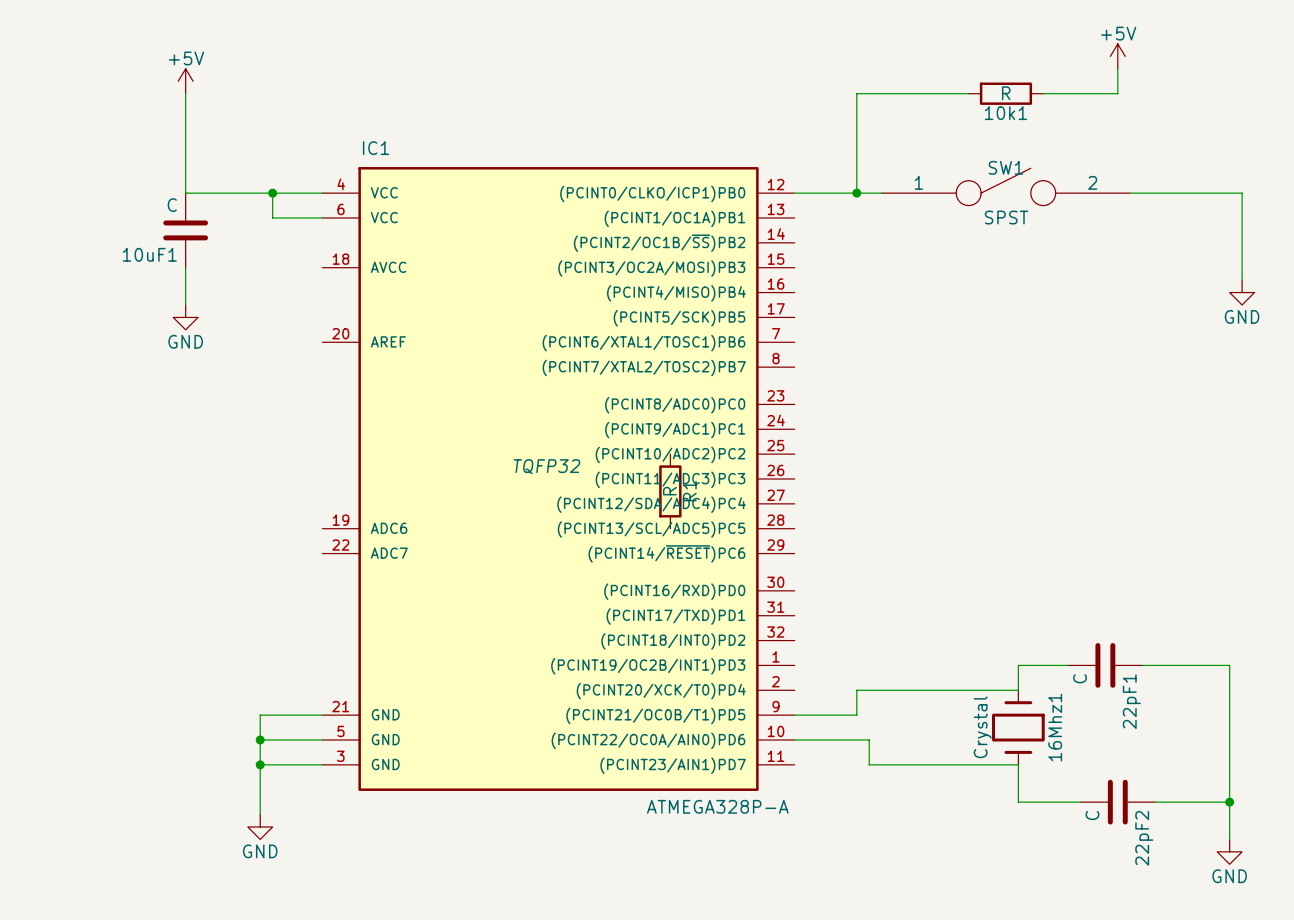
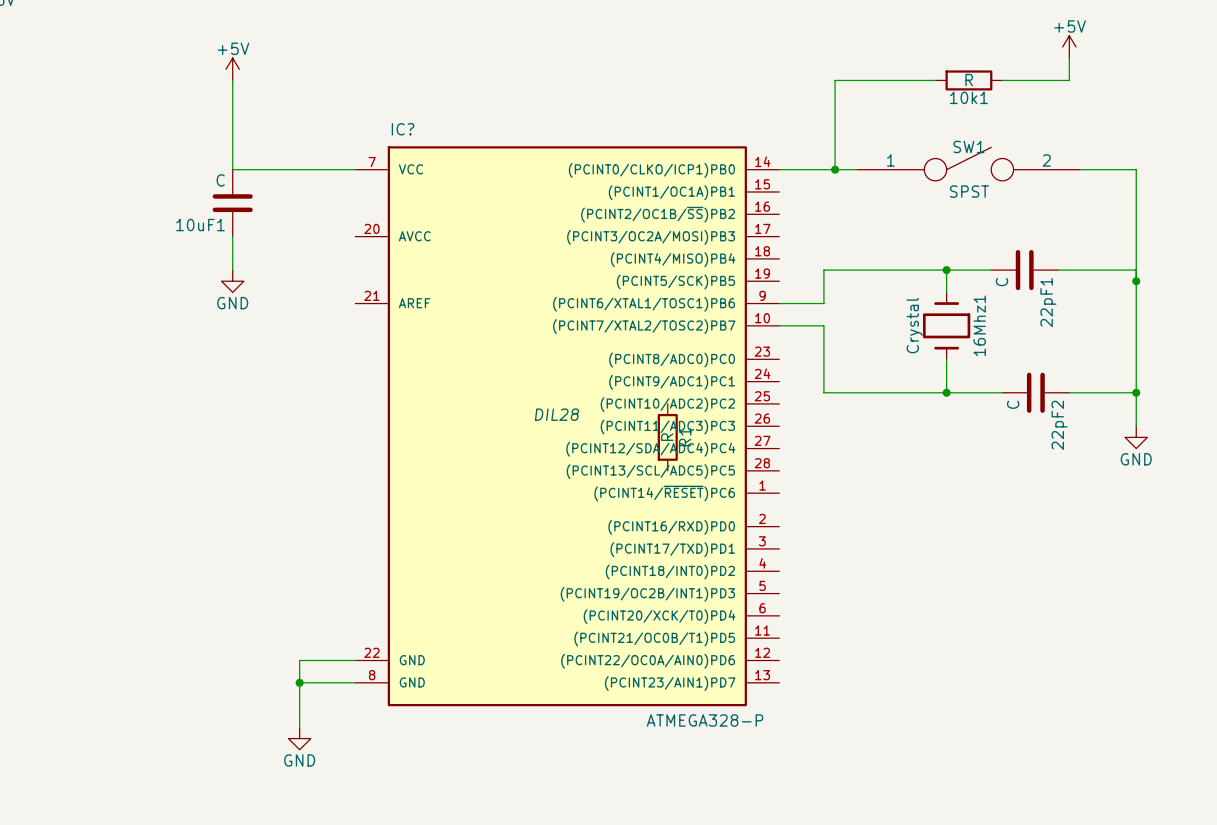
wire: (272, 193) (272, 217) (322, 217) -> none
junction: (272, 193) -> none
wire: (1192, 193) (1242, 193) (1242, 280) -> (1136, 169) (1136, 426)
power symbol: GND (1242, 292) -> none
wire: none -> (946, 270) (946, 292)
junction: none -> (946, 270)
wire: none -> (991, 270) (823, 270) (823, 303) (779, 303)
wire: none -> (1058, 270) (1136, 270)
junction: none -> (1136, 281)
wire: none -> (779, 325) (823, 325) (823, 392) (1002, 392)
wire: none -> (946, 359) (946, 392)
junction: none -> (946, 392)
wire: none -> (1069, 392) (1136, 392)
junction: none -> (1136, 392)
IC1: ATMEGA328P-A (558, 478) -> none
IC?: none -> ATMEGA328-P (567, 426)
power symbol: none -> GND (1136, 437)
wire: (1068, 665) (1018, 665) (1018, 690) (856, 690) (856, 715) (794, 715) -> none
22pF1 position: (1105, 665) -> (1024, 270)
wire: (1142, 665) (1229, 665) (1229, 839) -> none
wire: (322, 715) (260, 715) (260, 739) -> none
16Mhz1 position: (1018, 727) -> (946, 325)
junction: (260, 739) -> none
wire: (794, 739) (869, 739) (869, 764) (1018, 764) (1018, 802) (1080, 802) -> none
22pF2 position: (1117, 802) -> (1035, 392)
wire: (1155, 802) (1229, 802) -> none
junction: (1229, 802) -> none
power symbol: GND (1229, 851) -> none

